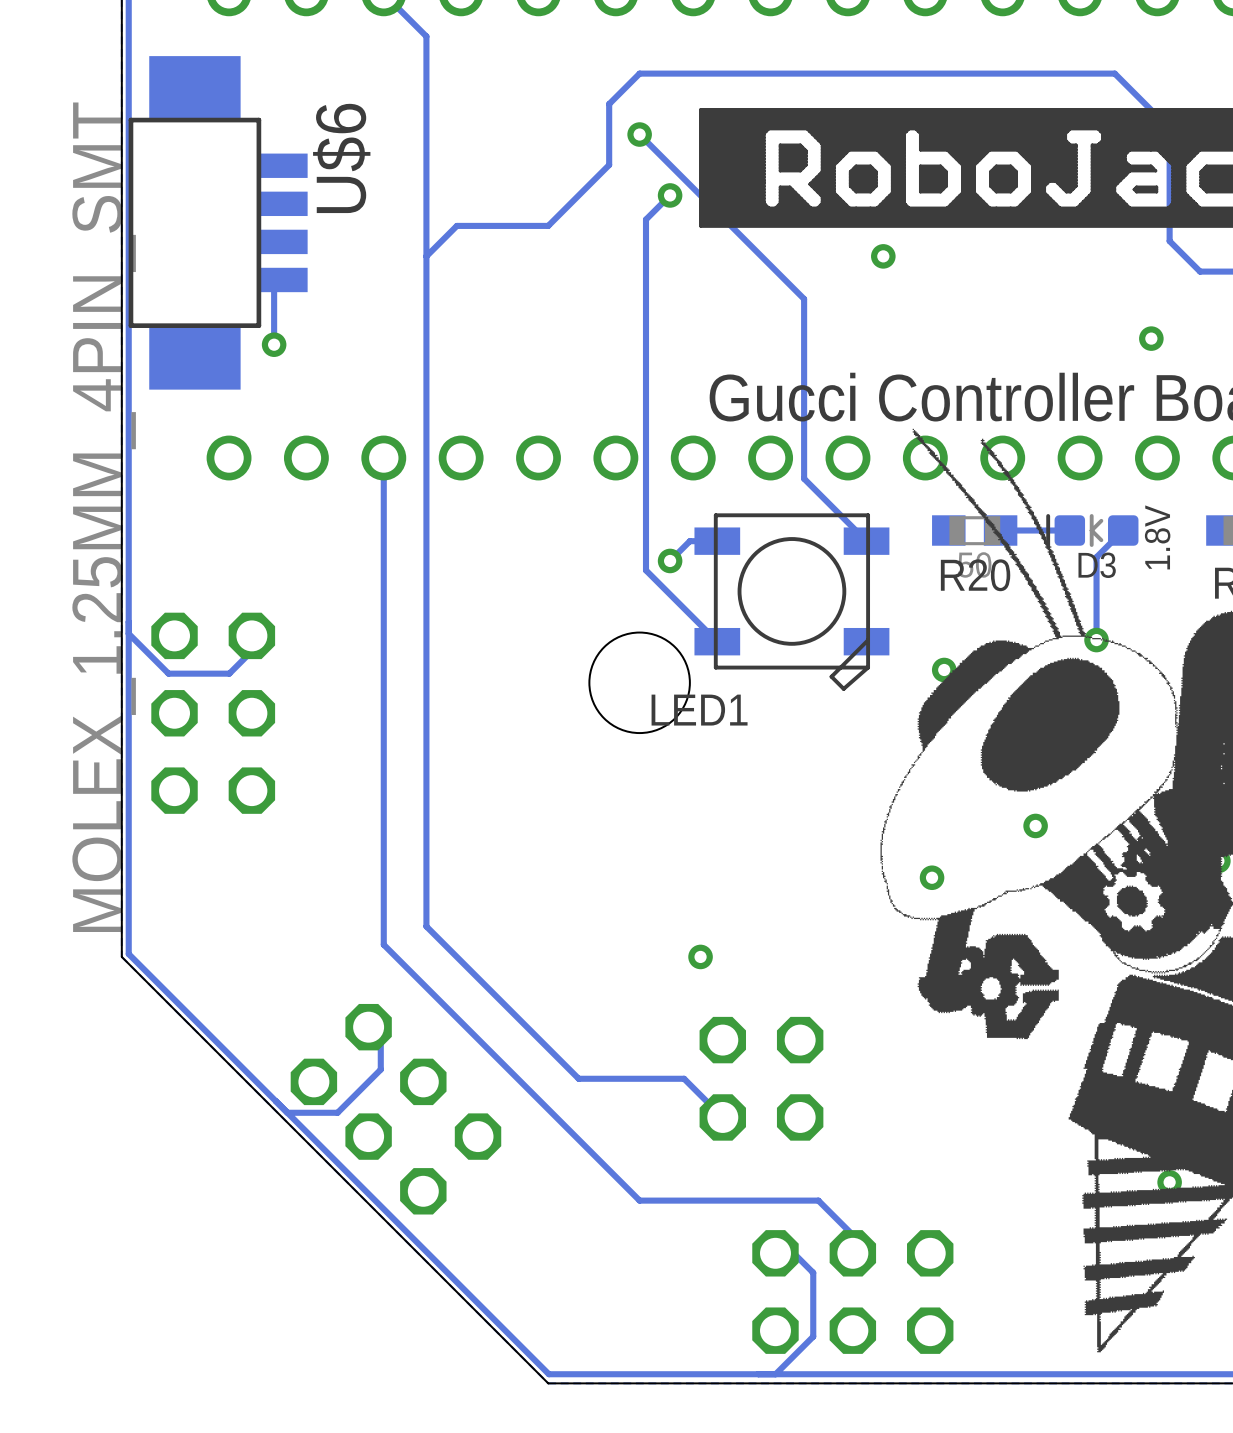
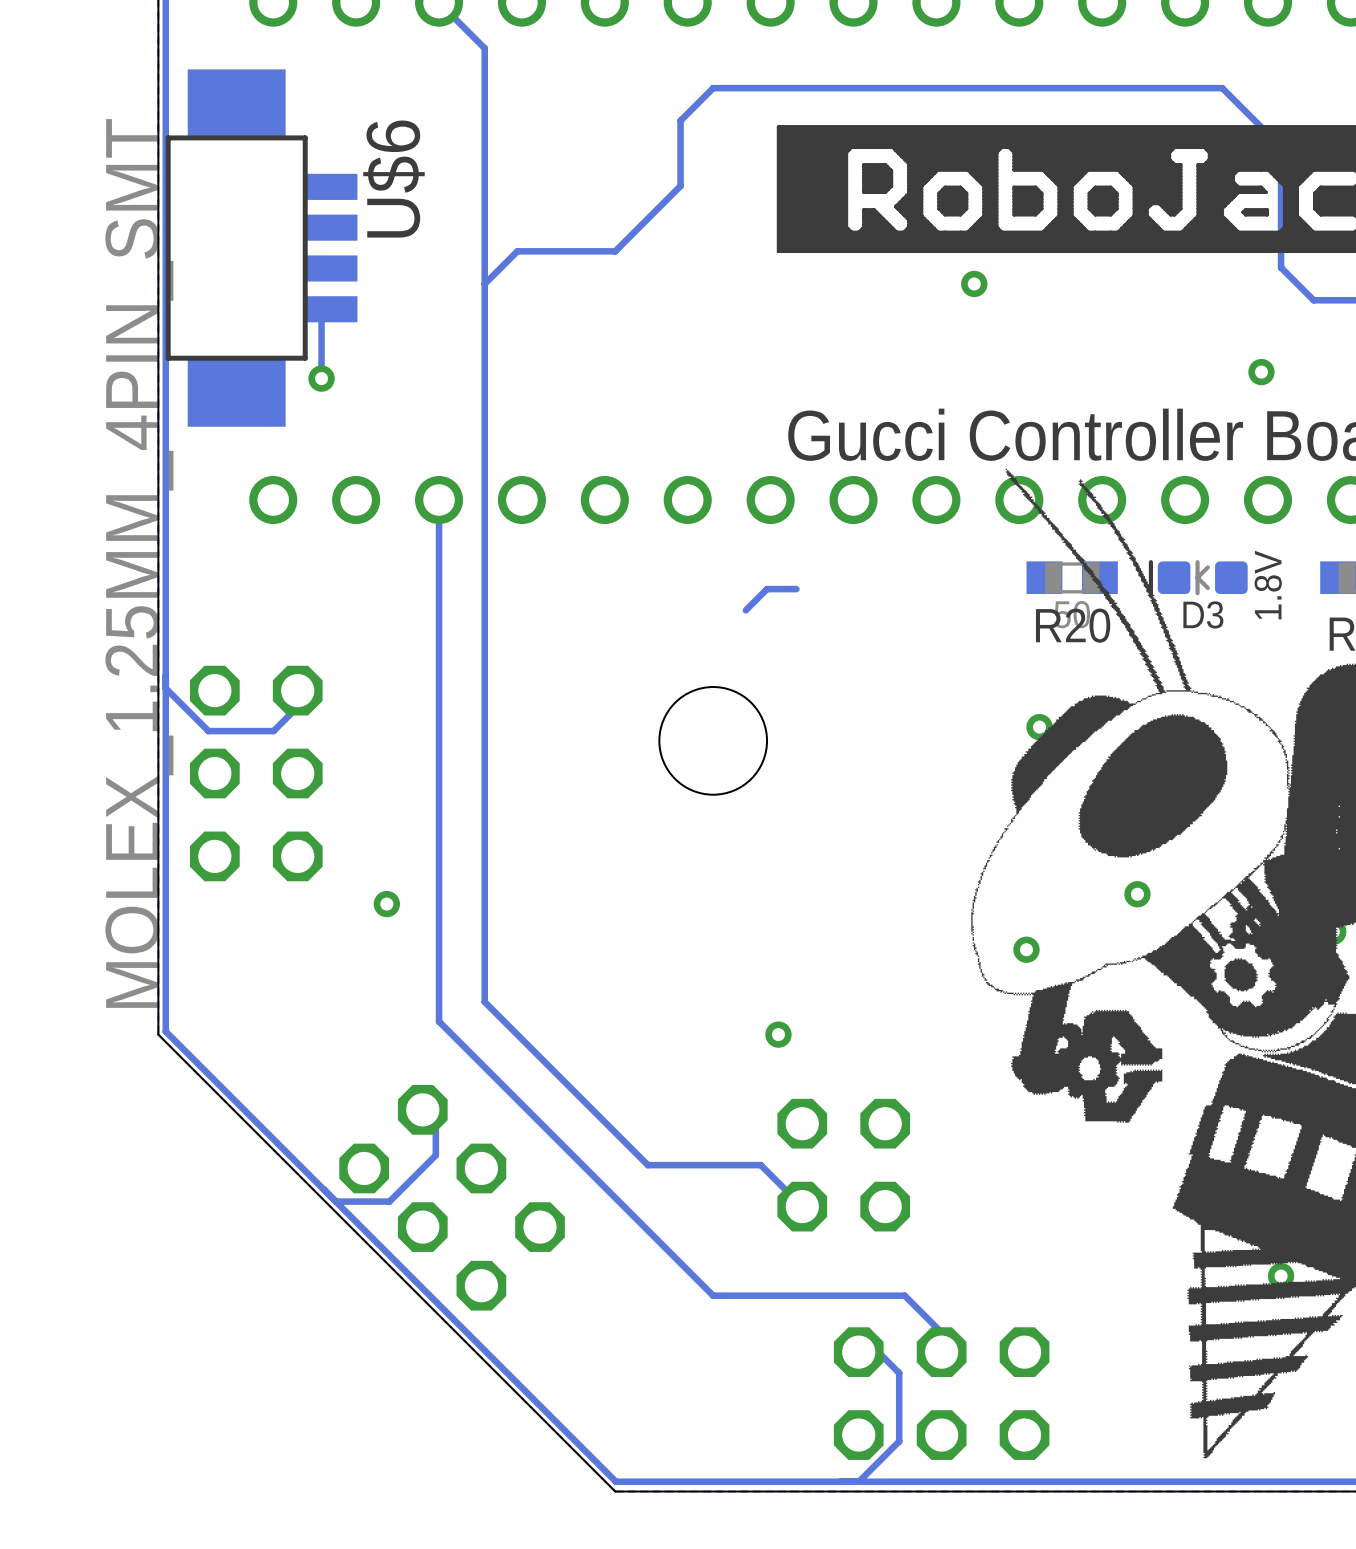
track: (639, 134) (804, 299) (804, 478) (866, 541) -> none
via: (639, 134) -> none
track: (670, 195) (646, 219) (646, 570) (717, 641) -> none
via: (670, 195) -> none
track: (1069, 530) (1000, 530) -> none
track: (1123, 530) (1096, 557) (1096, 640) -> none
via: (670, 560) -> none
LED1: (791, 602) -> none
via: (1096, 640) -> none
via: none -> (386, 904)

